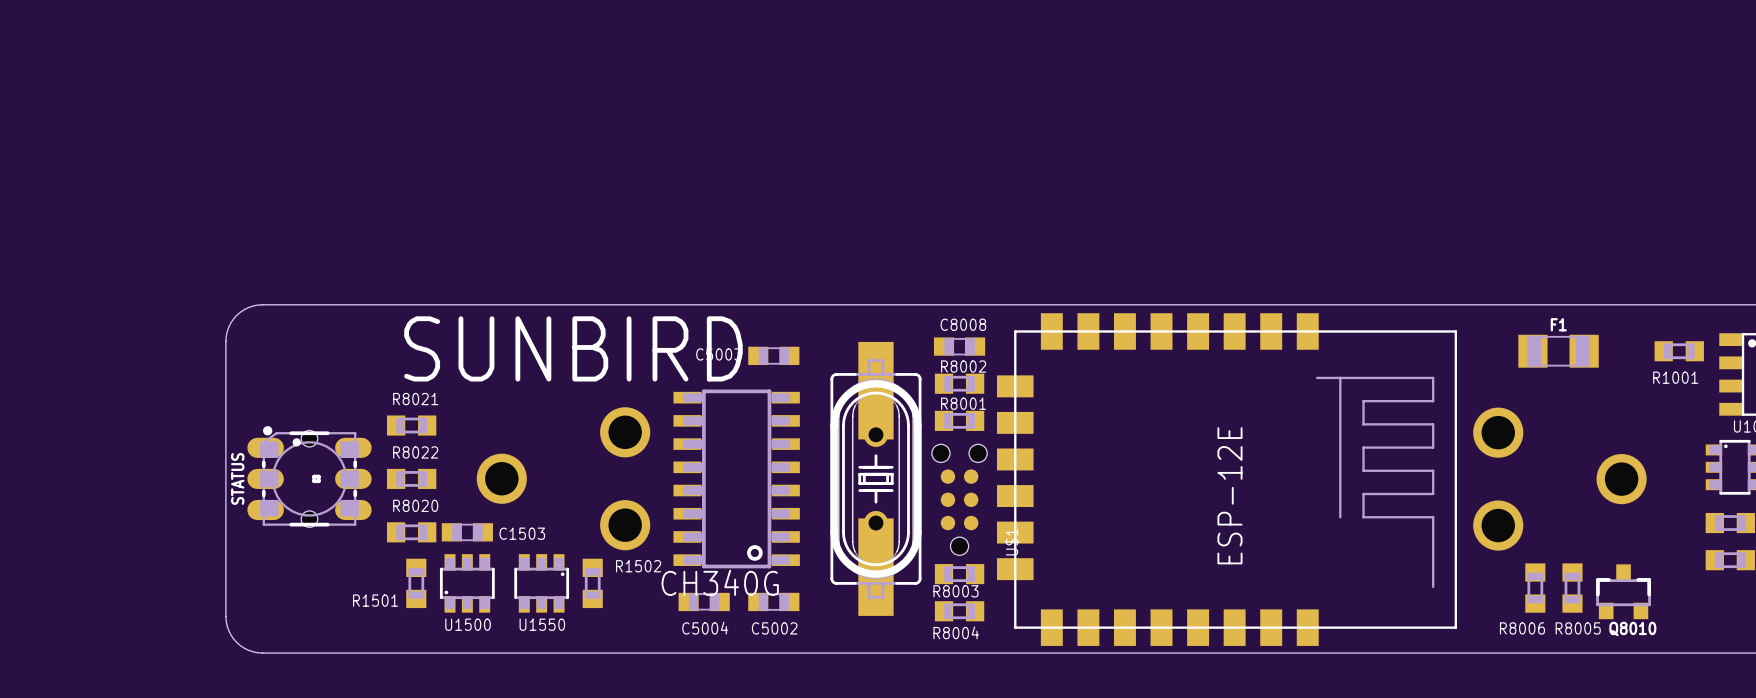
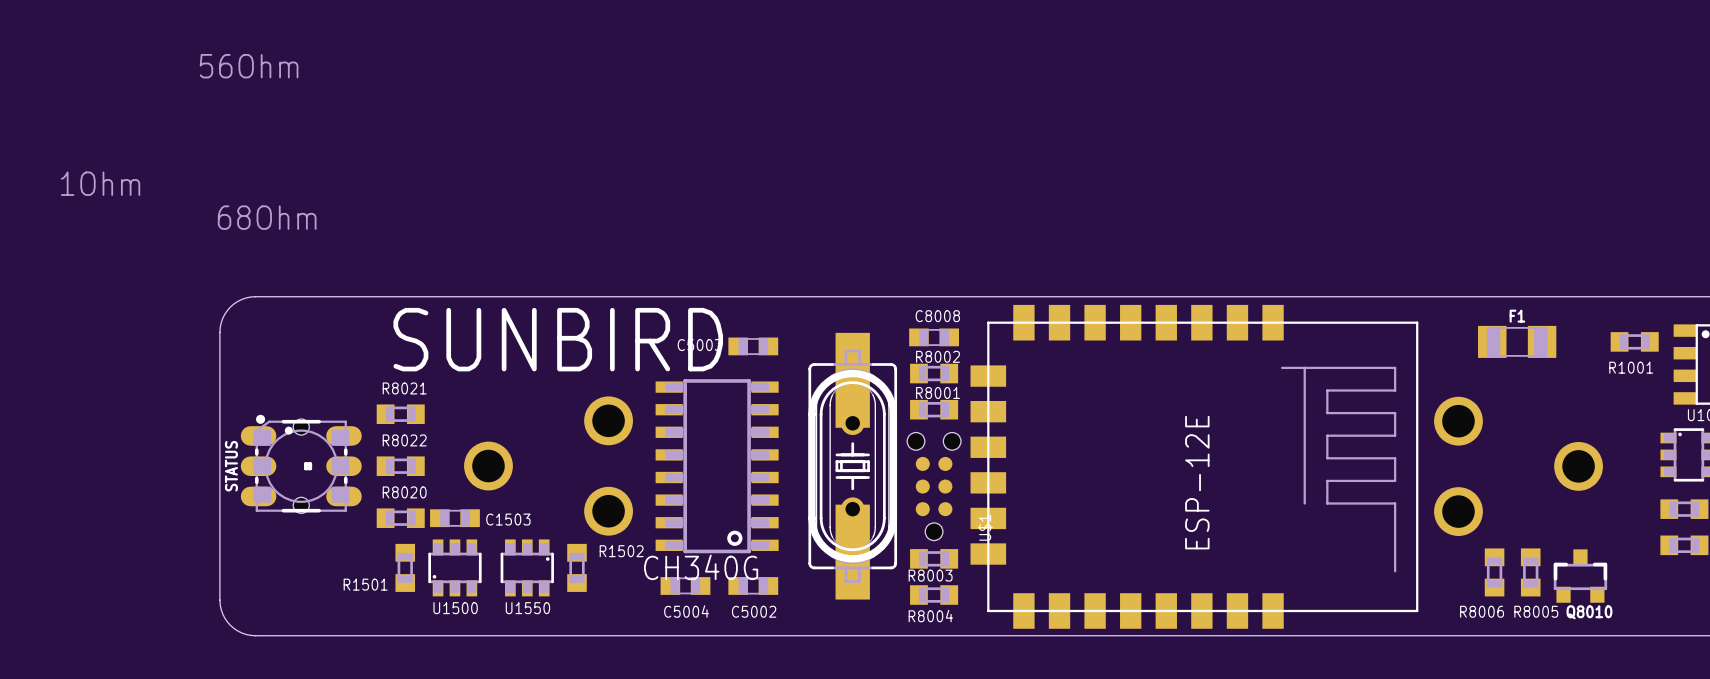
R8021 value: none -> 56Ohm (249, 66)
R8020 value: none -> 1Ohm (100, 183)
R8022 value: none -> 68Ohm (267, 217)

